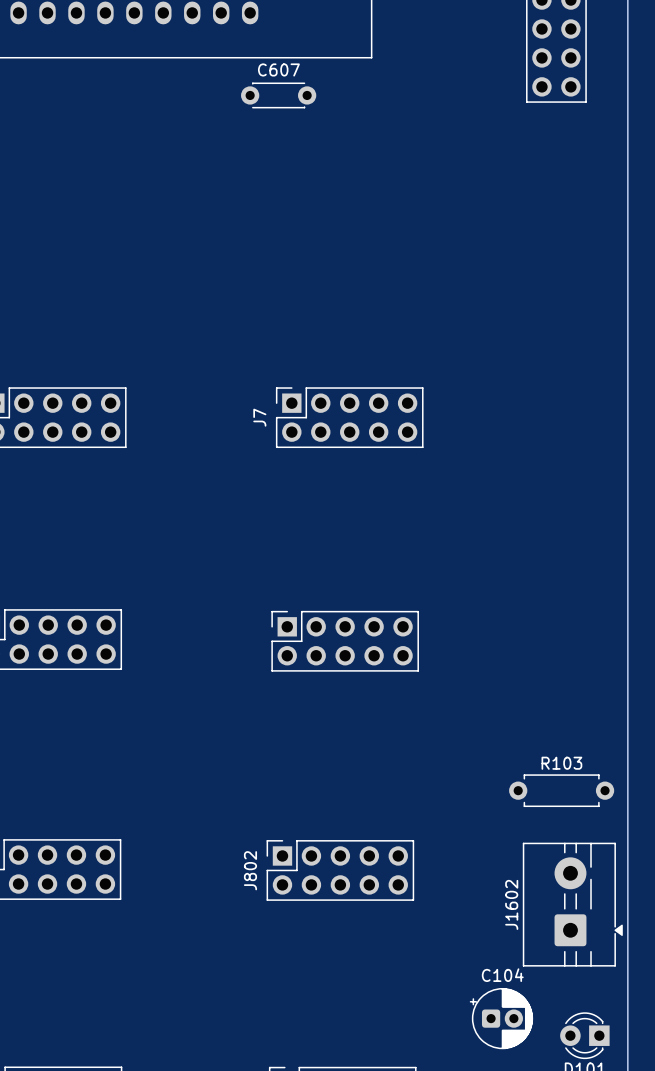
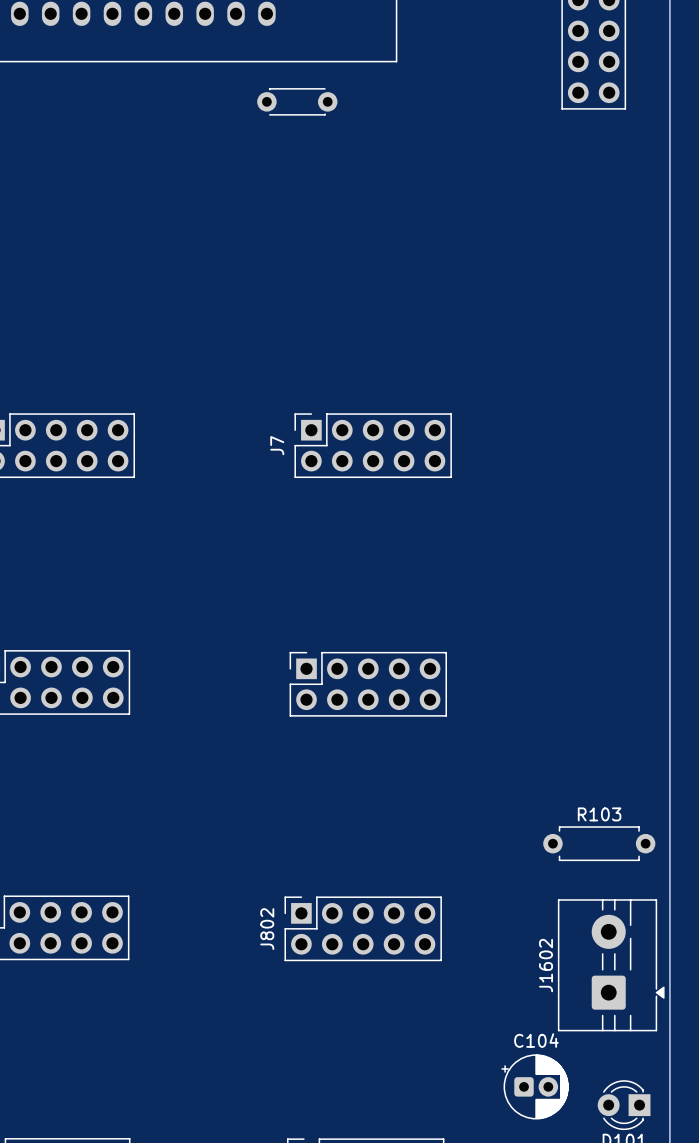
C607 name: C607 (278, 69) -> none

